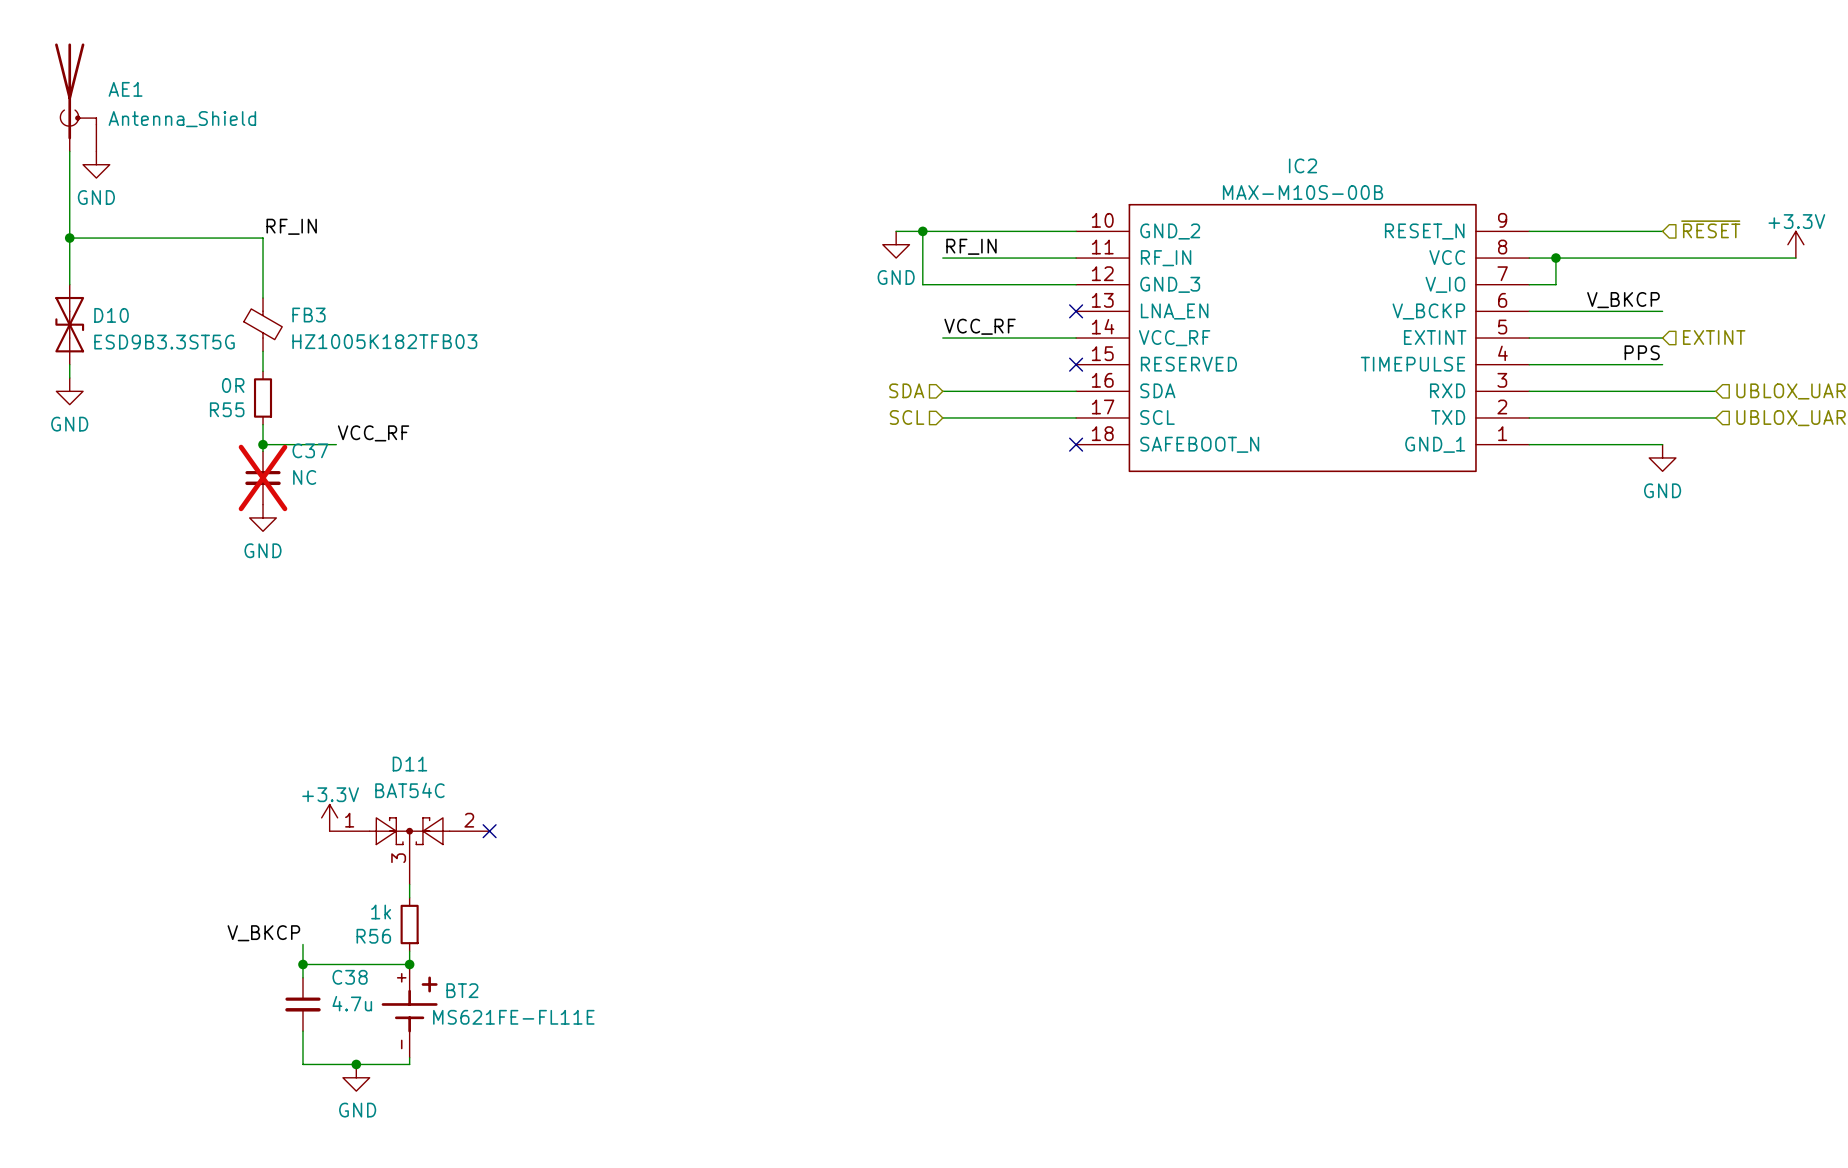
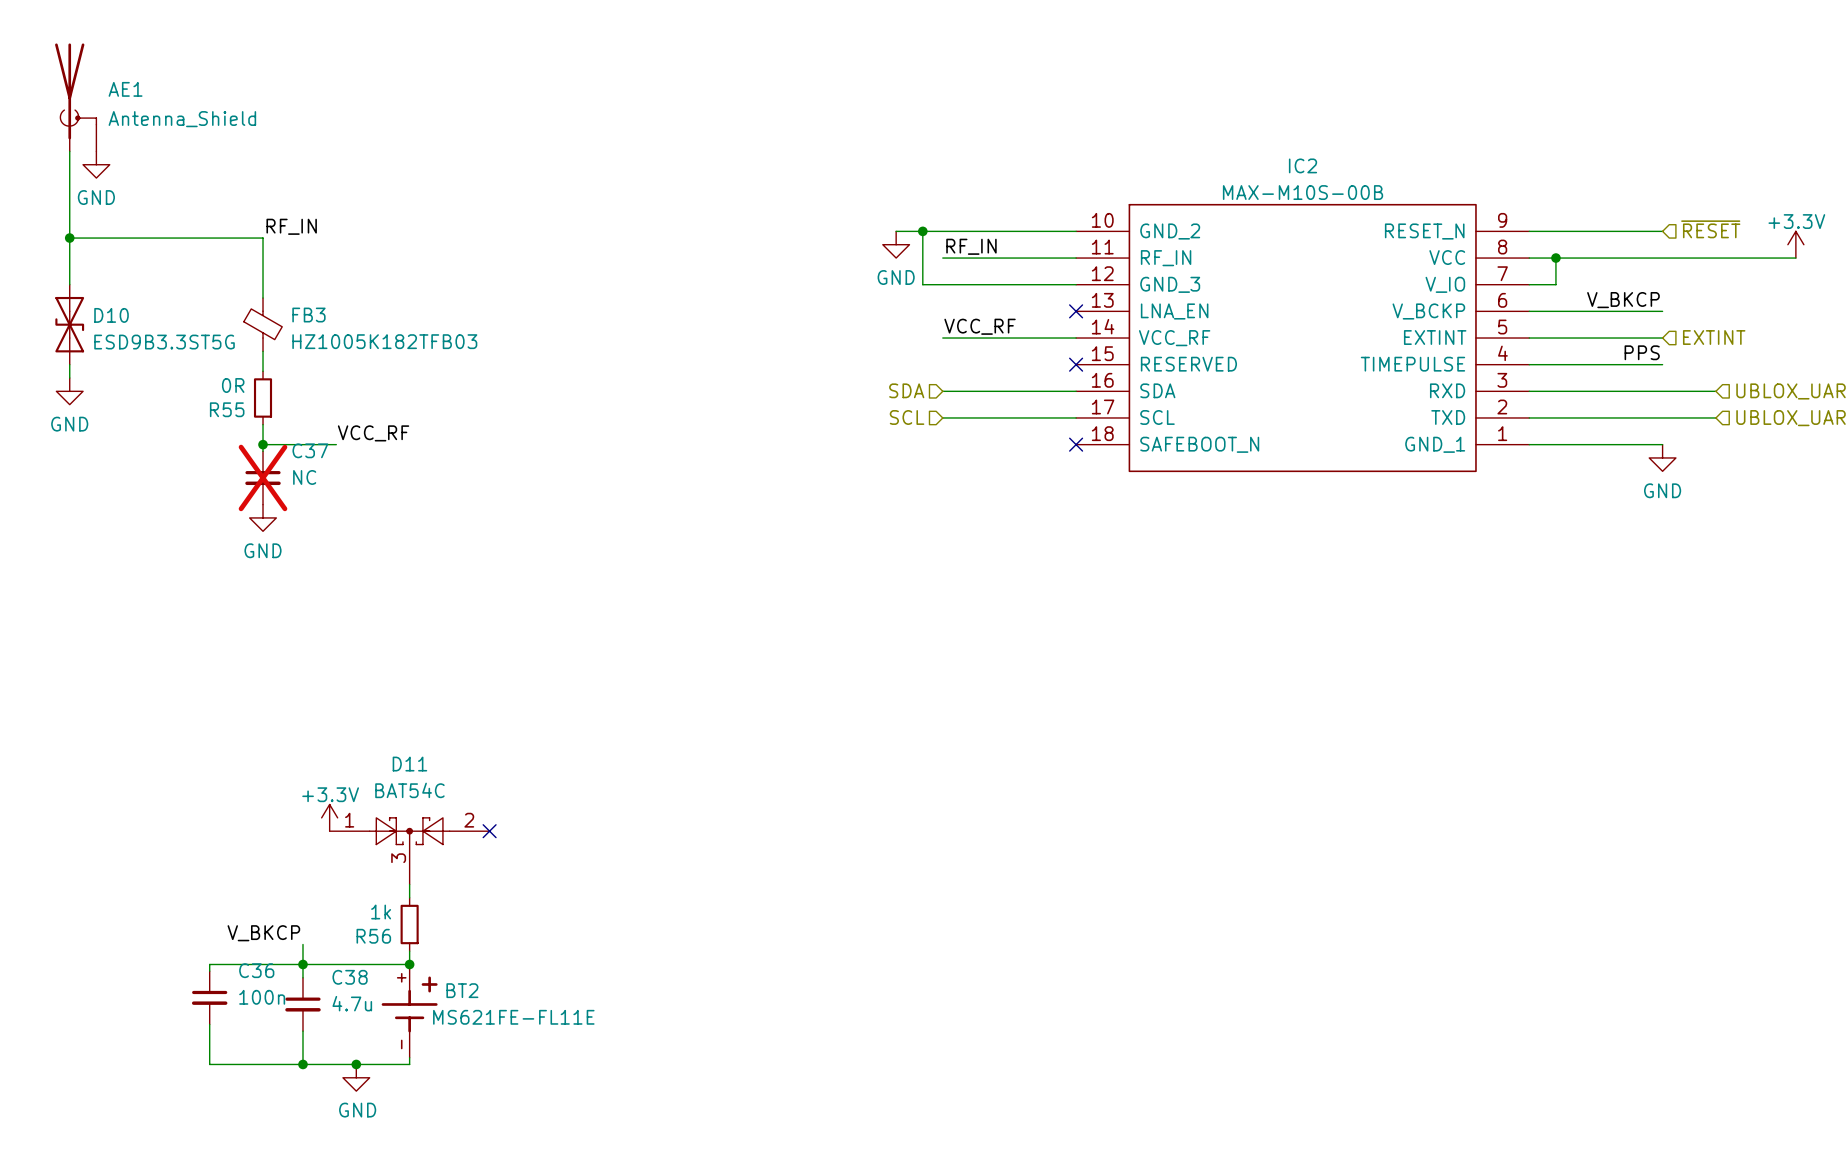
wire: none -> (302, 964) (209, 964) (209, 971)
C36: none -> 100n (209, 997)
wire: none -> (209, 1024) (209, 1064) (302, 1064)
junction: none -> (302, 1064)

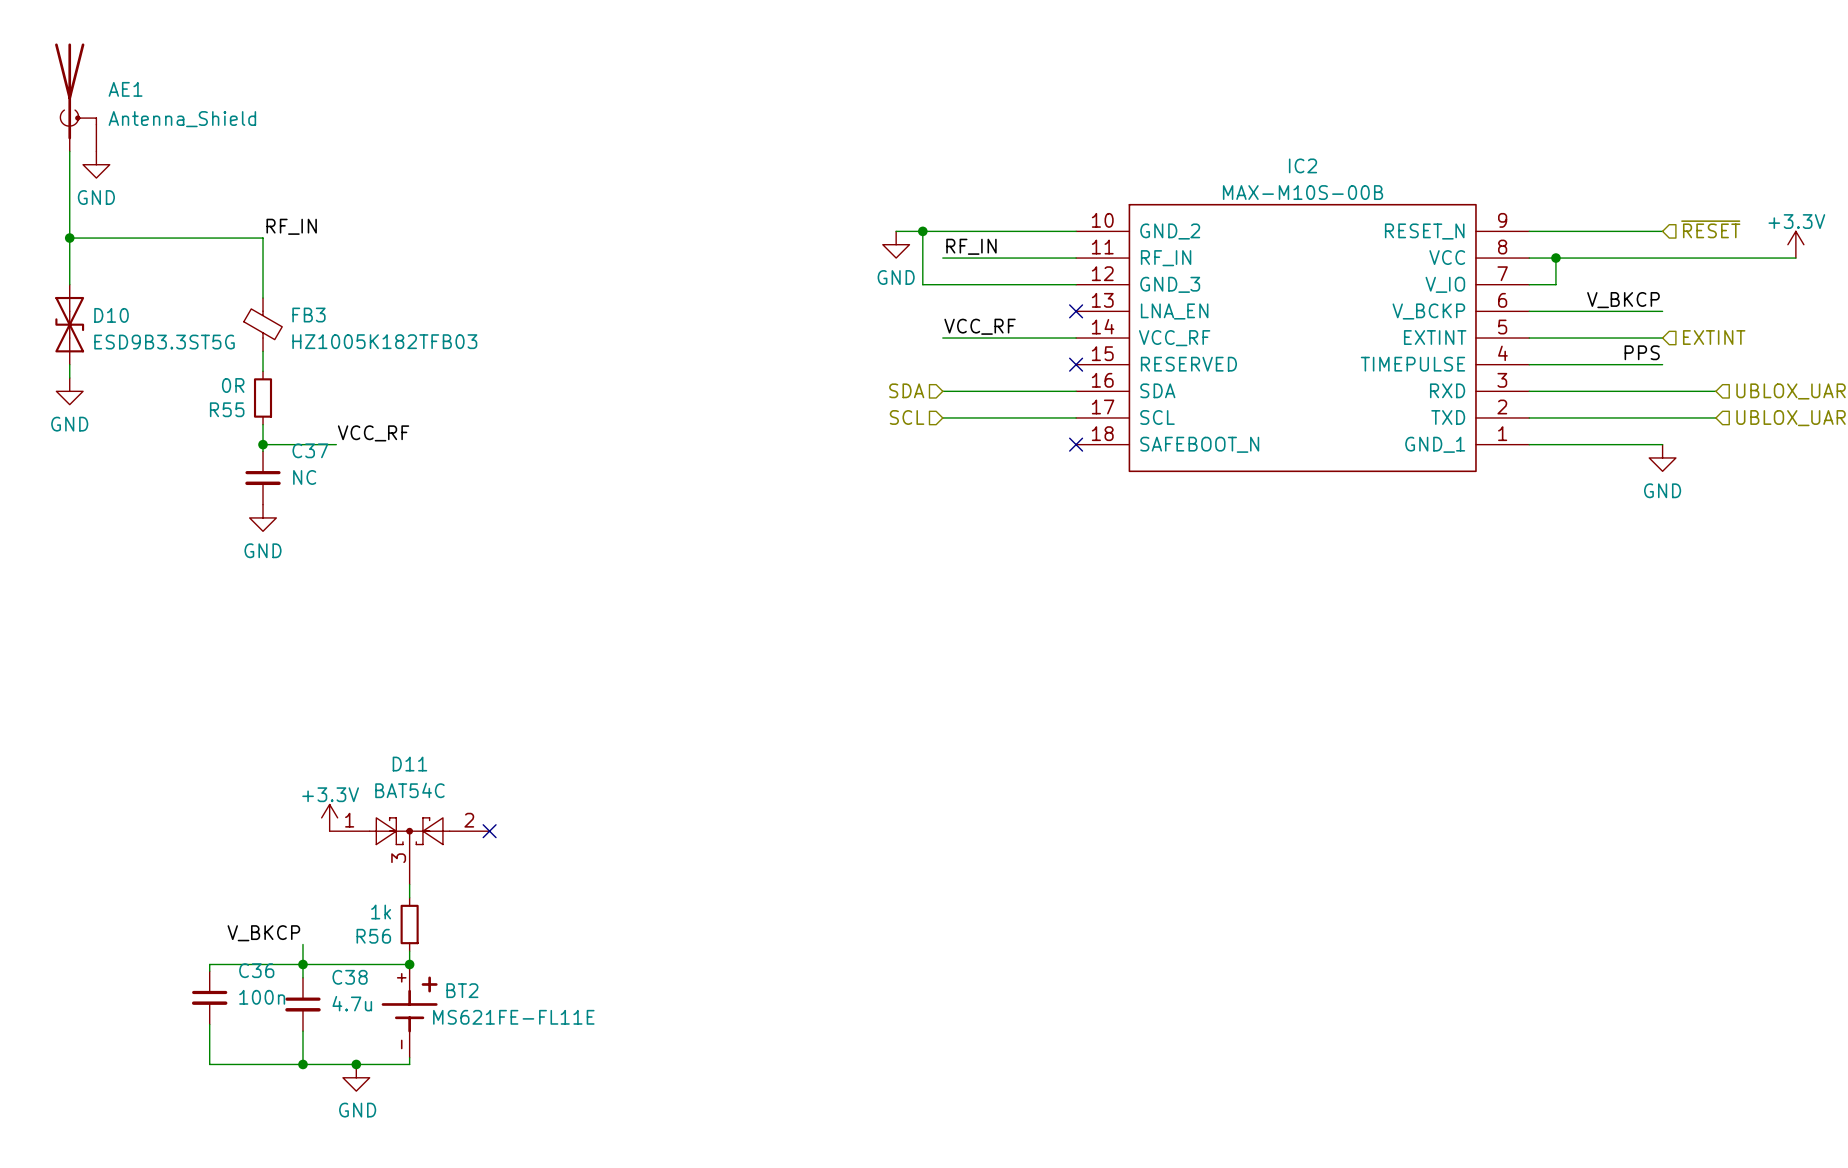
C37 do-not-place cross: (263, 477) -> none

